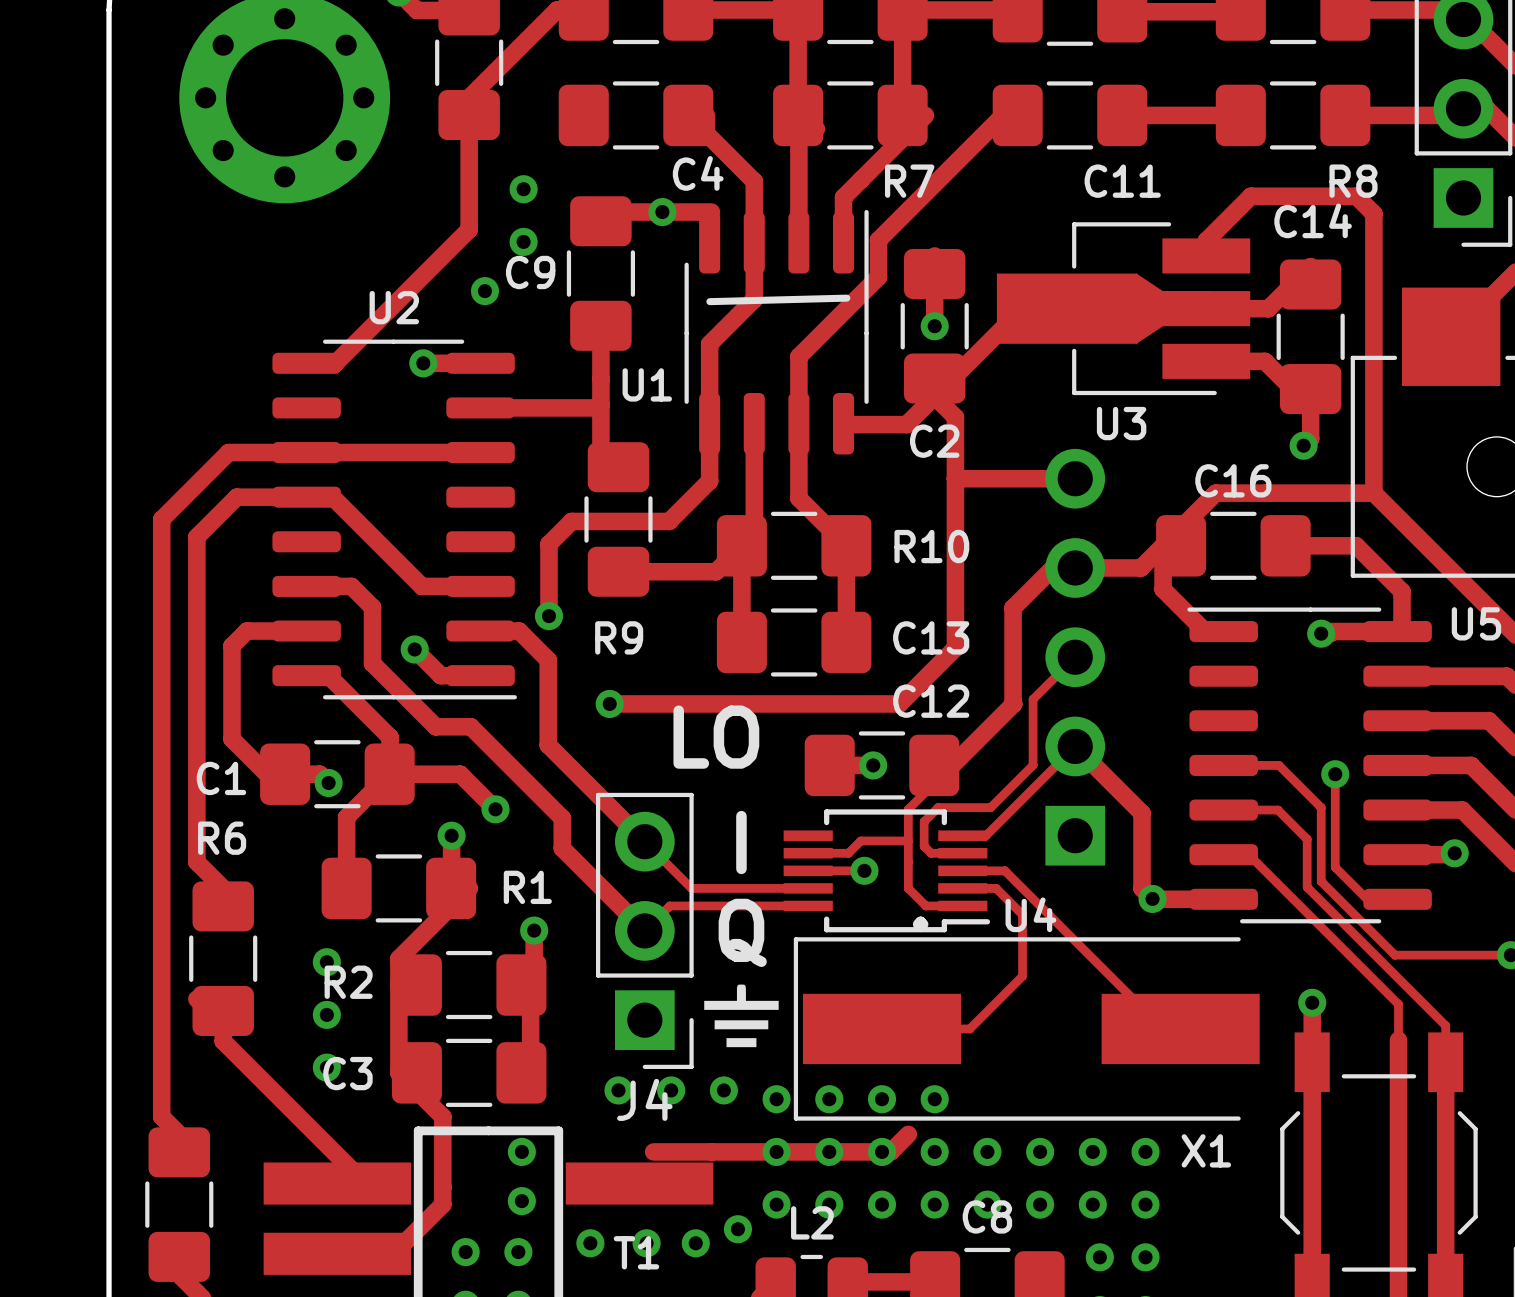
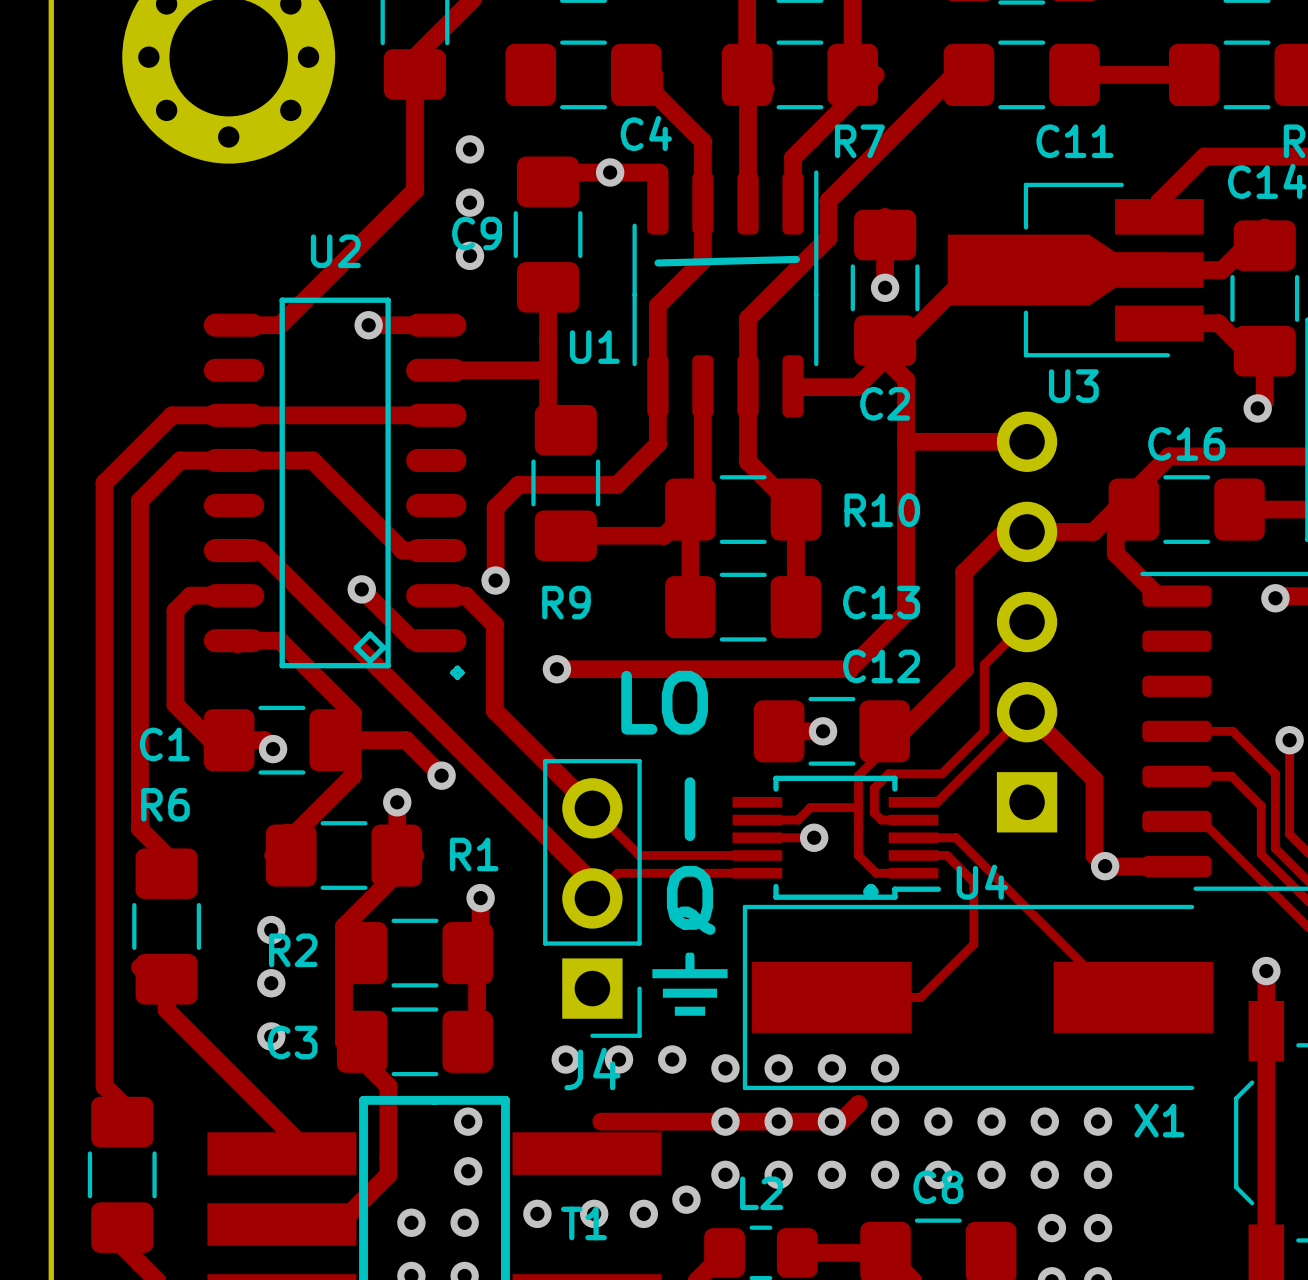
via position: (484, 291) -> (469, 255)
U2 footprint: [272, 339, 517, 700] -> [203, 297, 467, 680]
track: (332, 497) (421, 586) (457, 586) -> (277, 460) (312, 460) (402, 550)
track: (316, 586) (351, 586) (372, 607) (372, 663) (435, 726) (470, 726) (562, 818) (562, 848) (644, 930) -> (260, 550) (592, 882)
track: (414, 649) (440, 675) (467, 675) -> (361, 589) (413, 640)
via position: (414, 649) -> (361, 589)
track: (328, 675) (390, 737) (390, 773) (346, 817) (346, 888) -> (272, 640) (279, 640) (352, 713) (352, 775) (273, 855)

